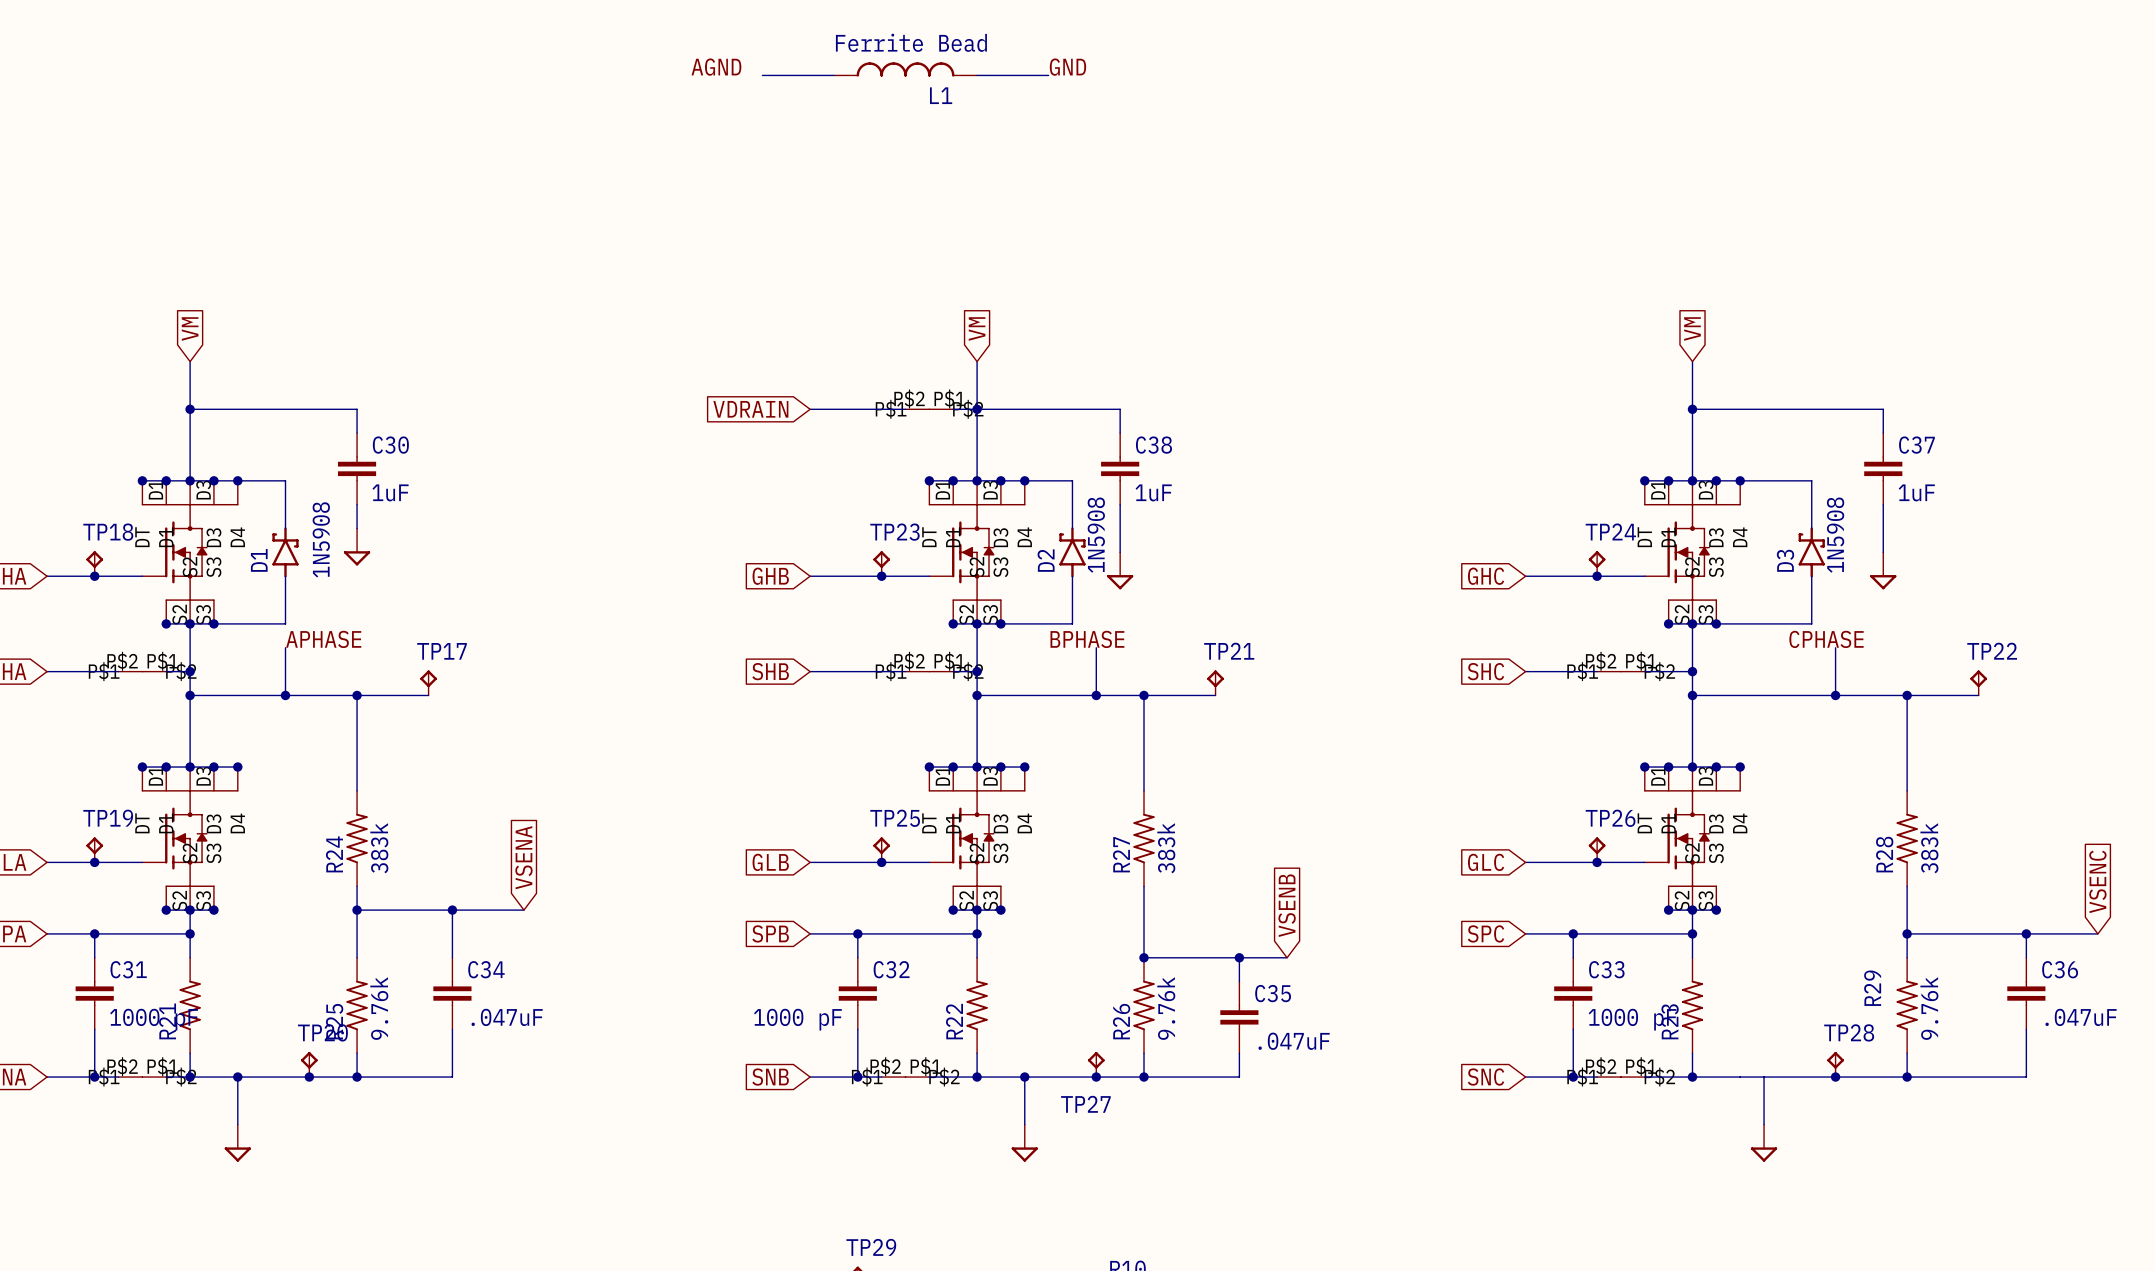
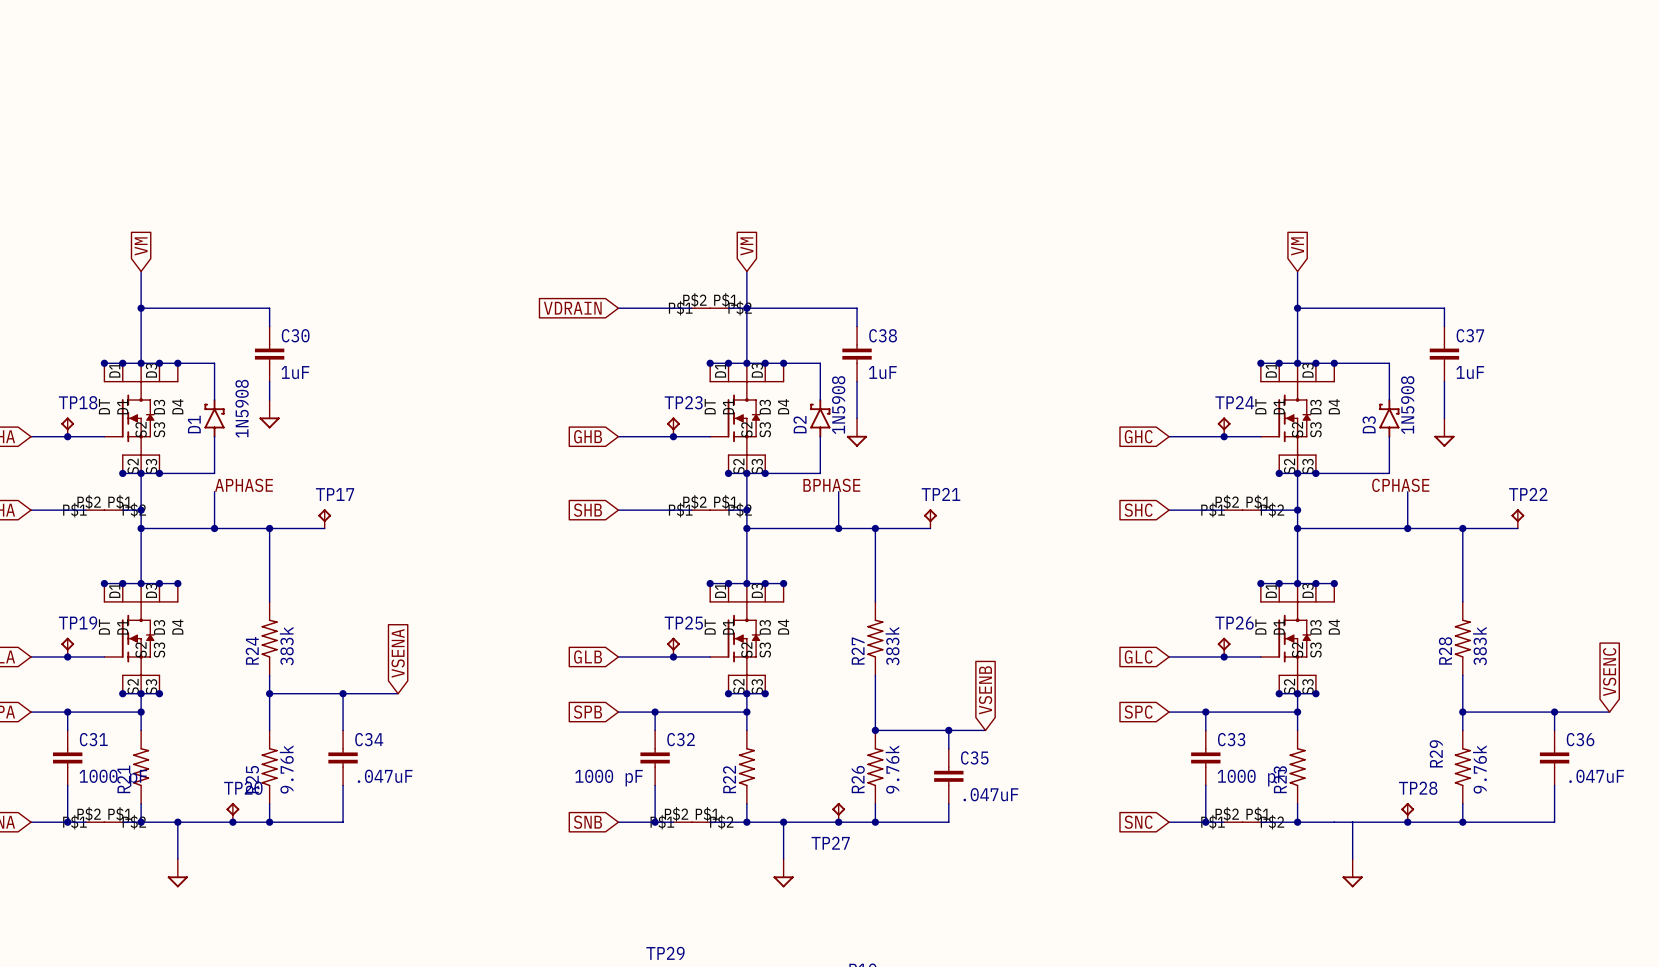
text: Ferrite Bead (911, 42) -> none
label: AGND (716, 67) -> none
label: GND (1067, 67) -> none
L1: (905, 69) -> none
wire: (762, 75) (833, 75) -> none
wire: (977, 75) (1048, 75) -> none

